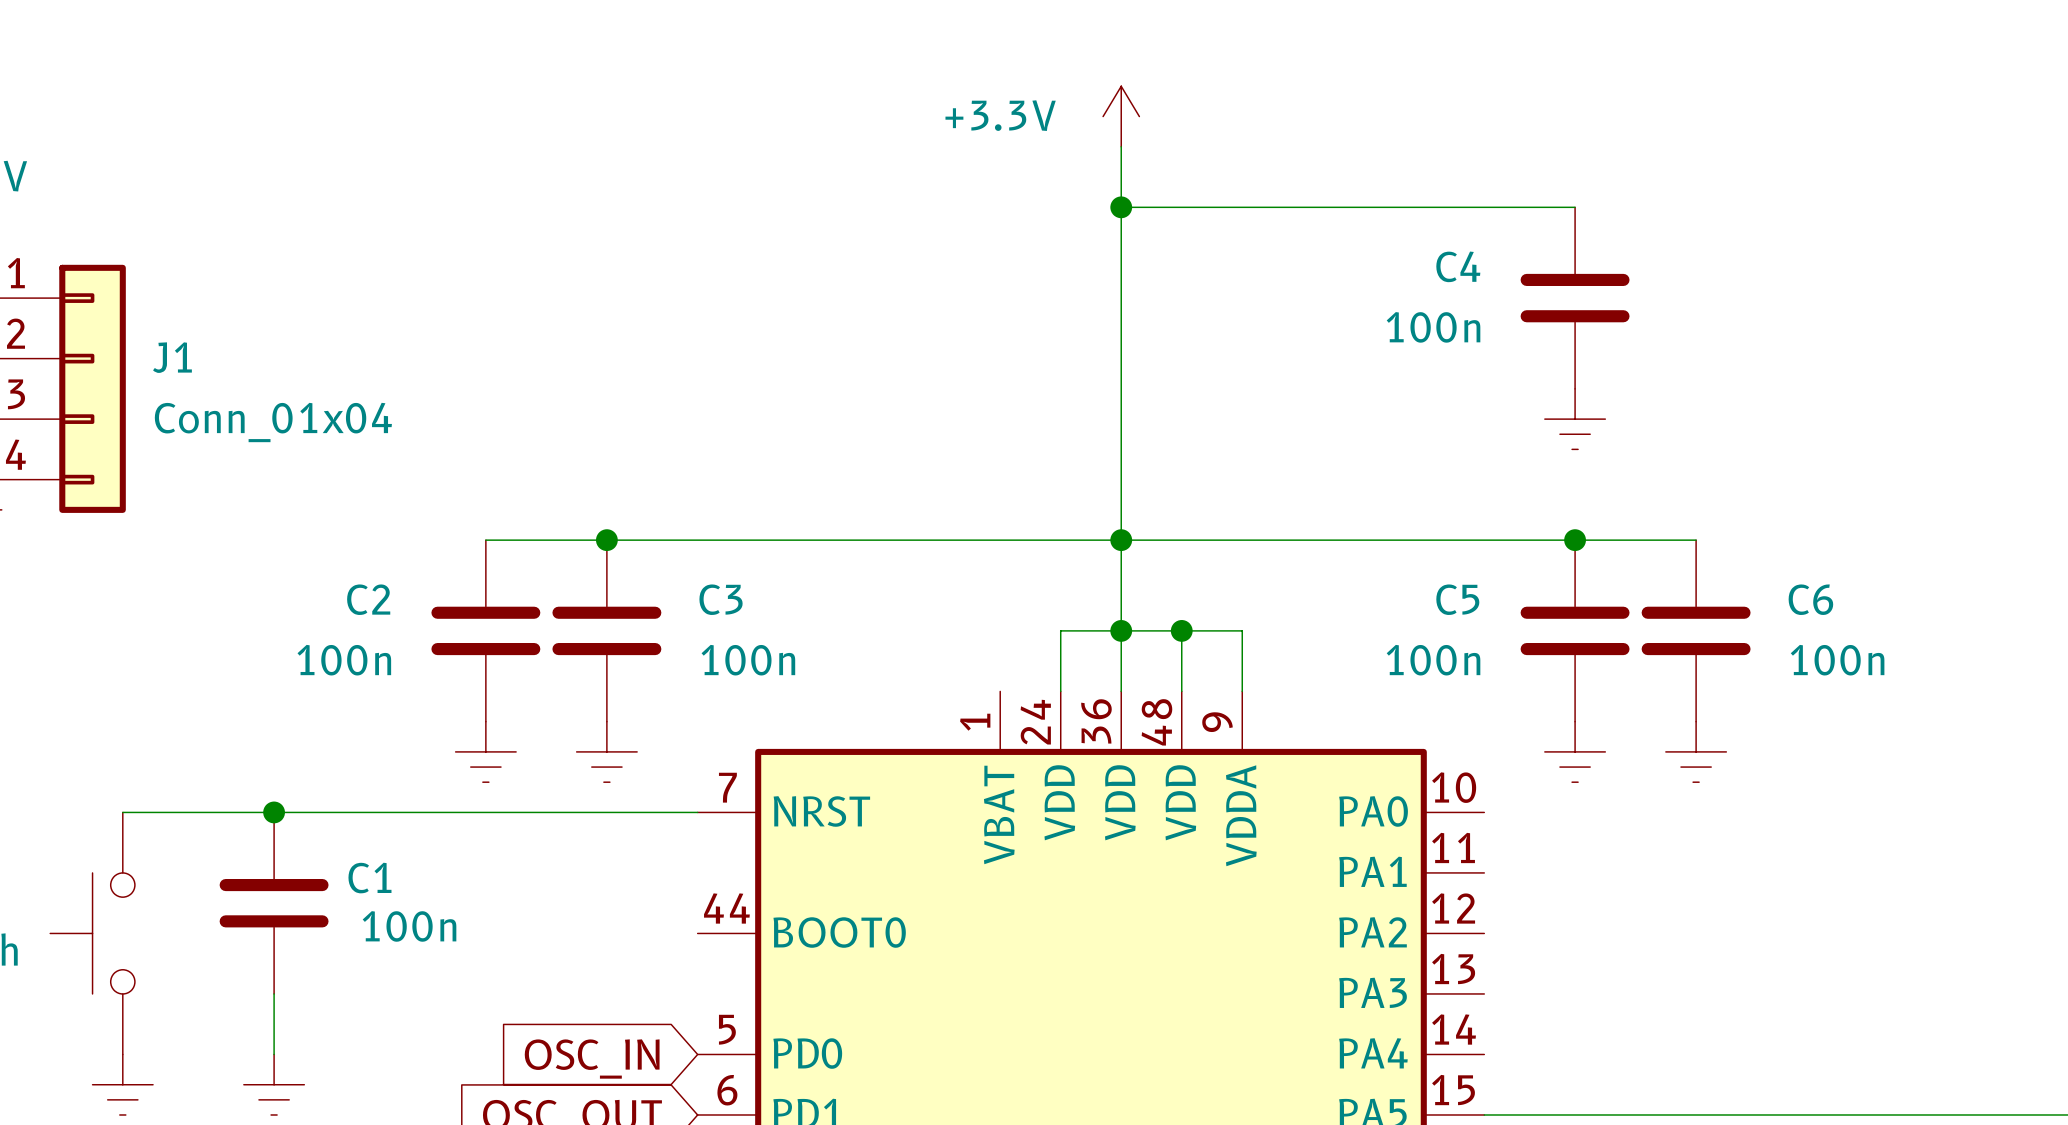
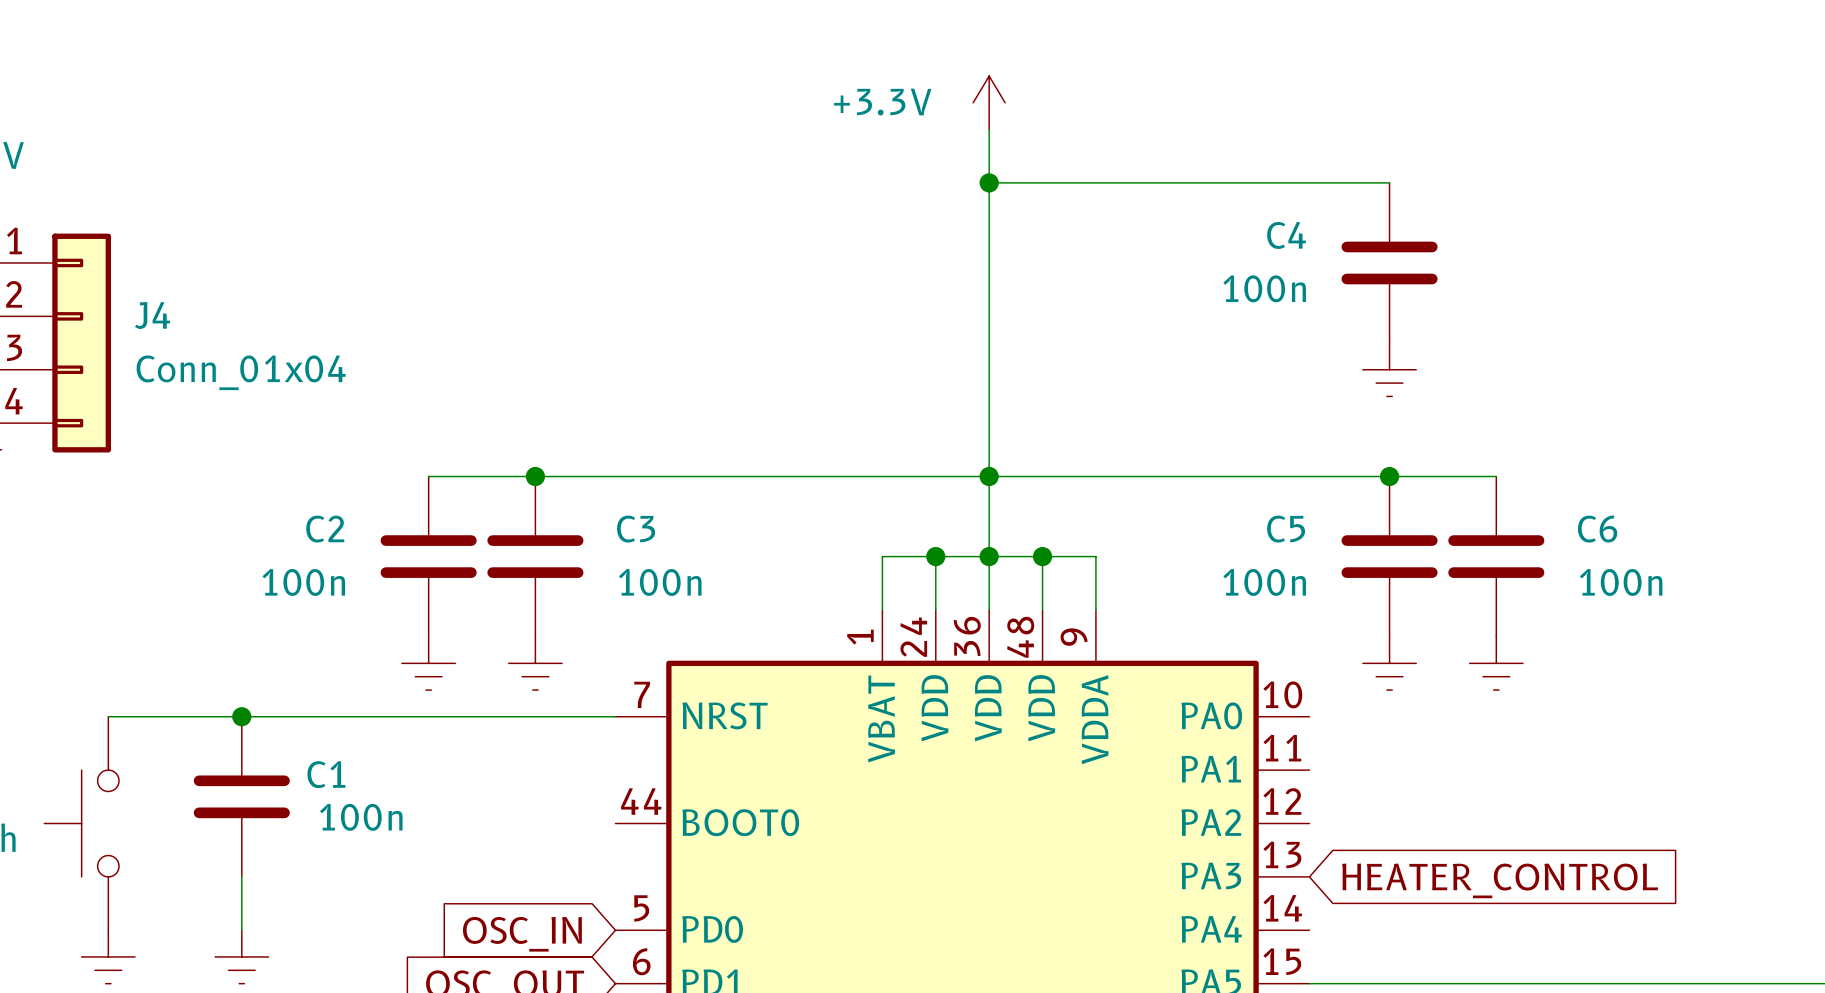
J1 name: J1 (172, 357) -> J4 (152, 315)
wire: none -> (935, 556) (882, 556) (882, 609)
junction: none -> (935, 556)
global label: none -> HEATER_CONTROL (1500, 880)

